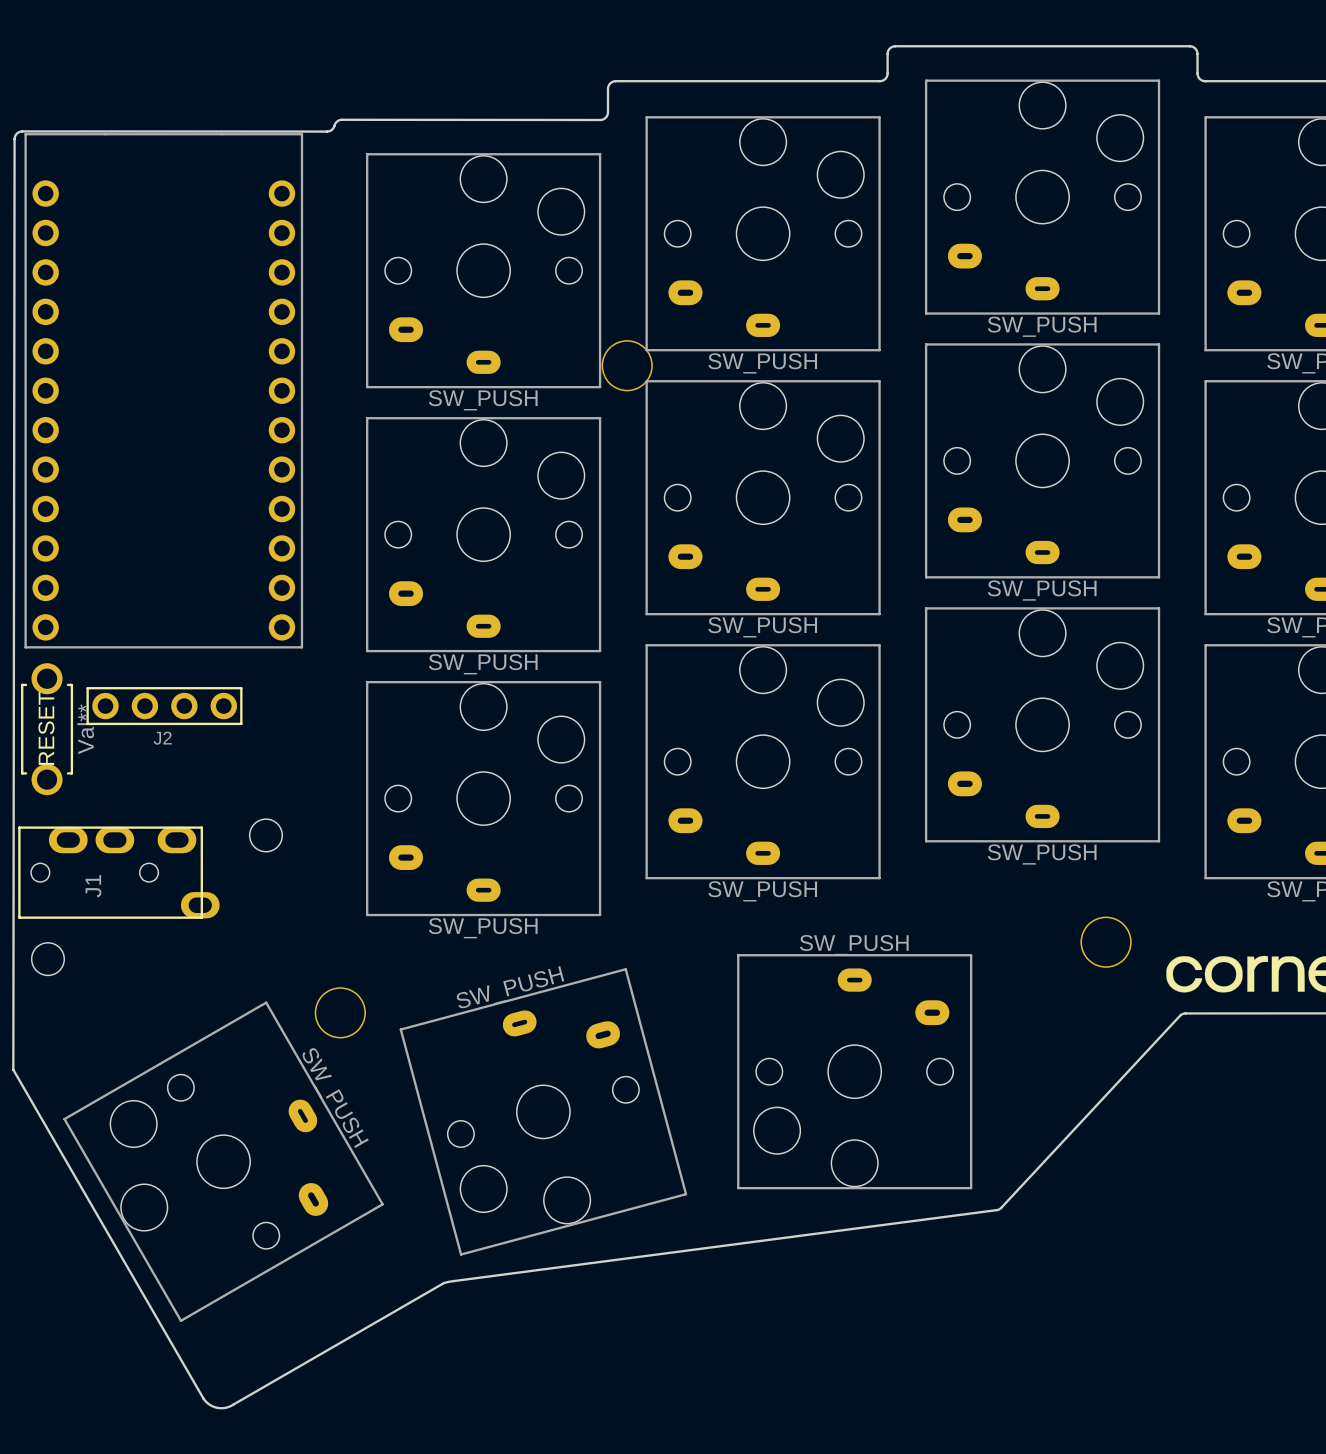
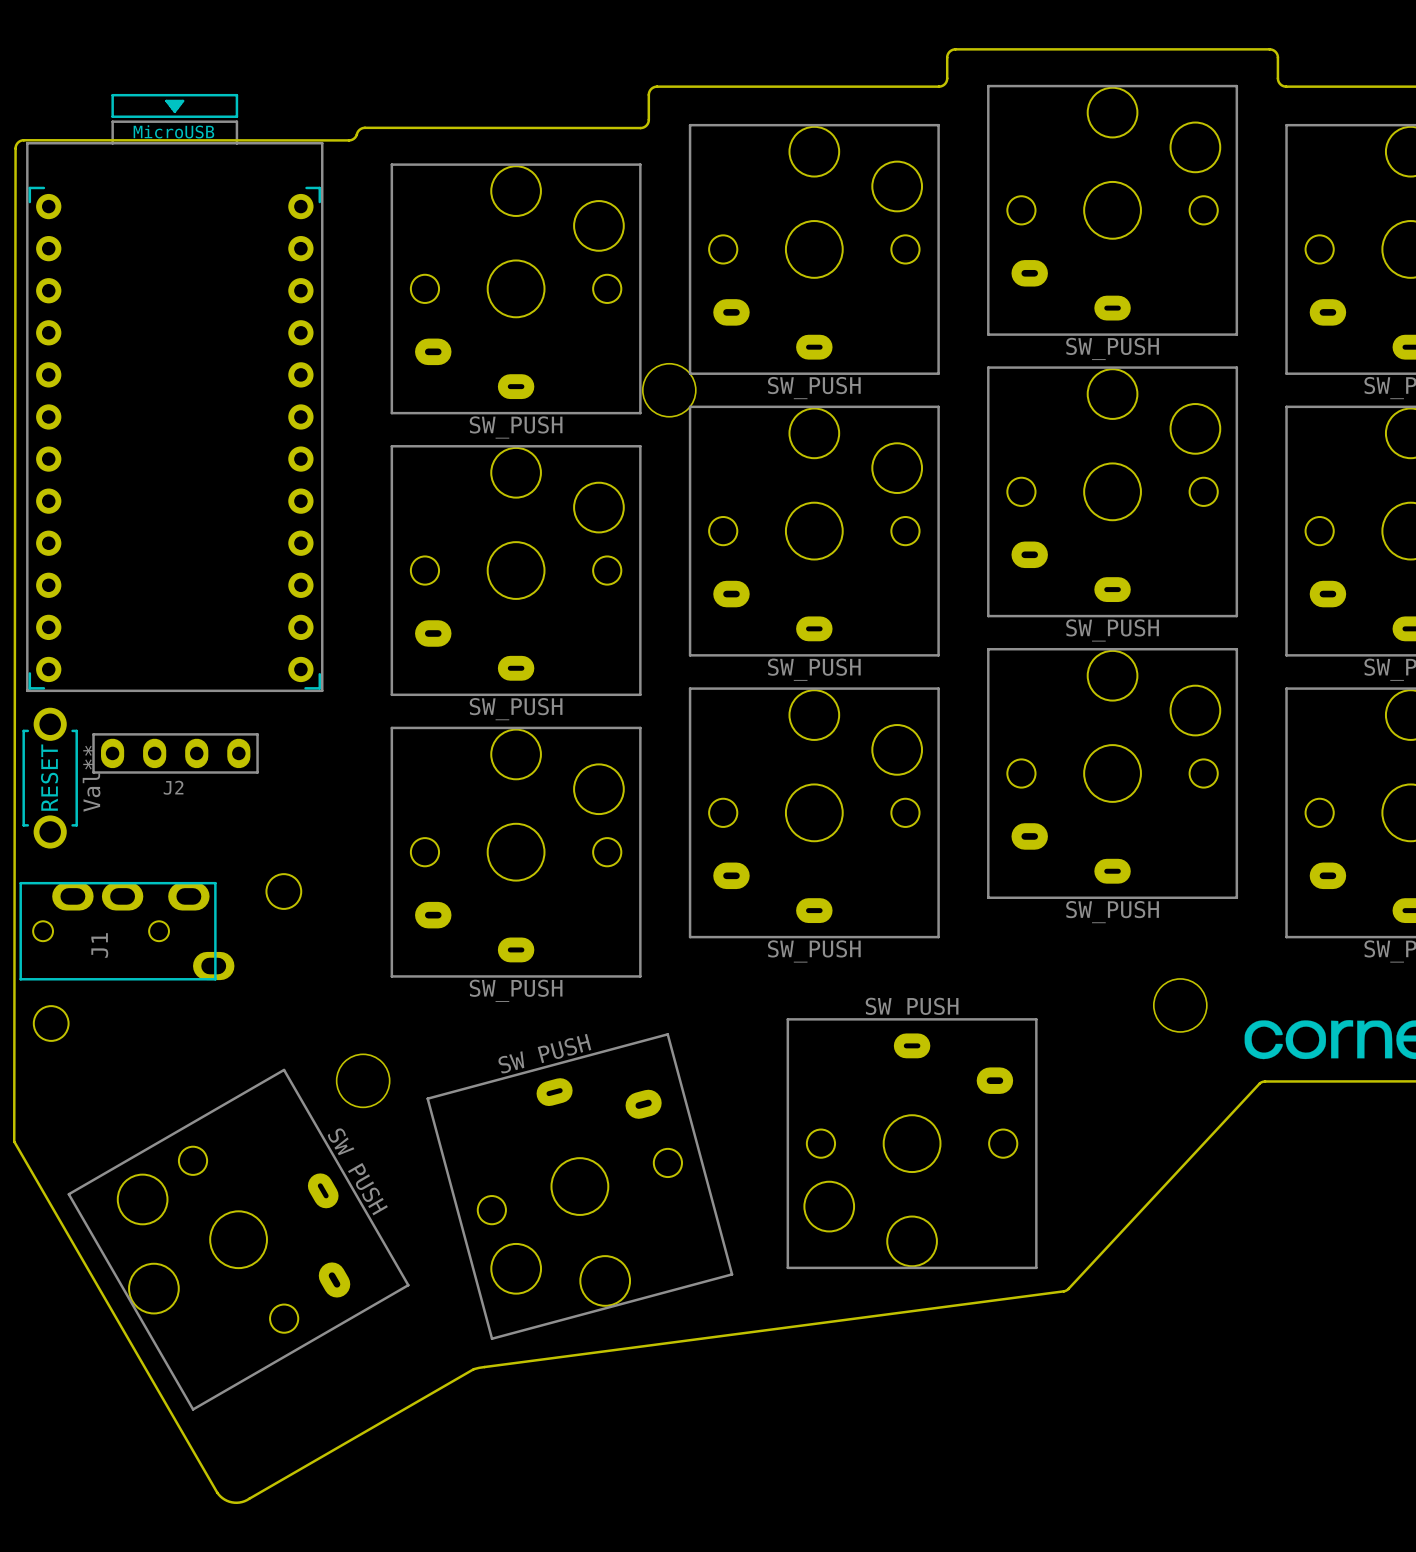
part: none -> (174, 393)
part: (163, 390) -> none
J2 footprint: [86, 687, 243, 726] -> [92, 733, 259, 774]

